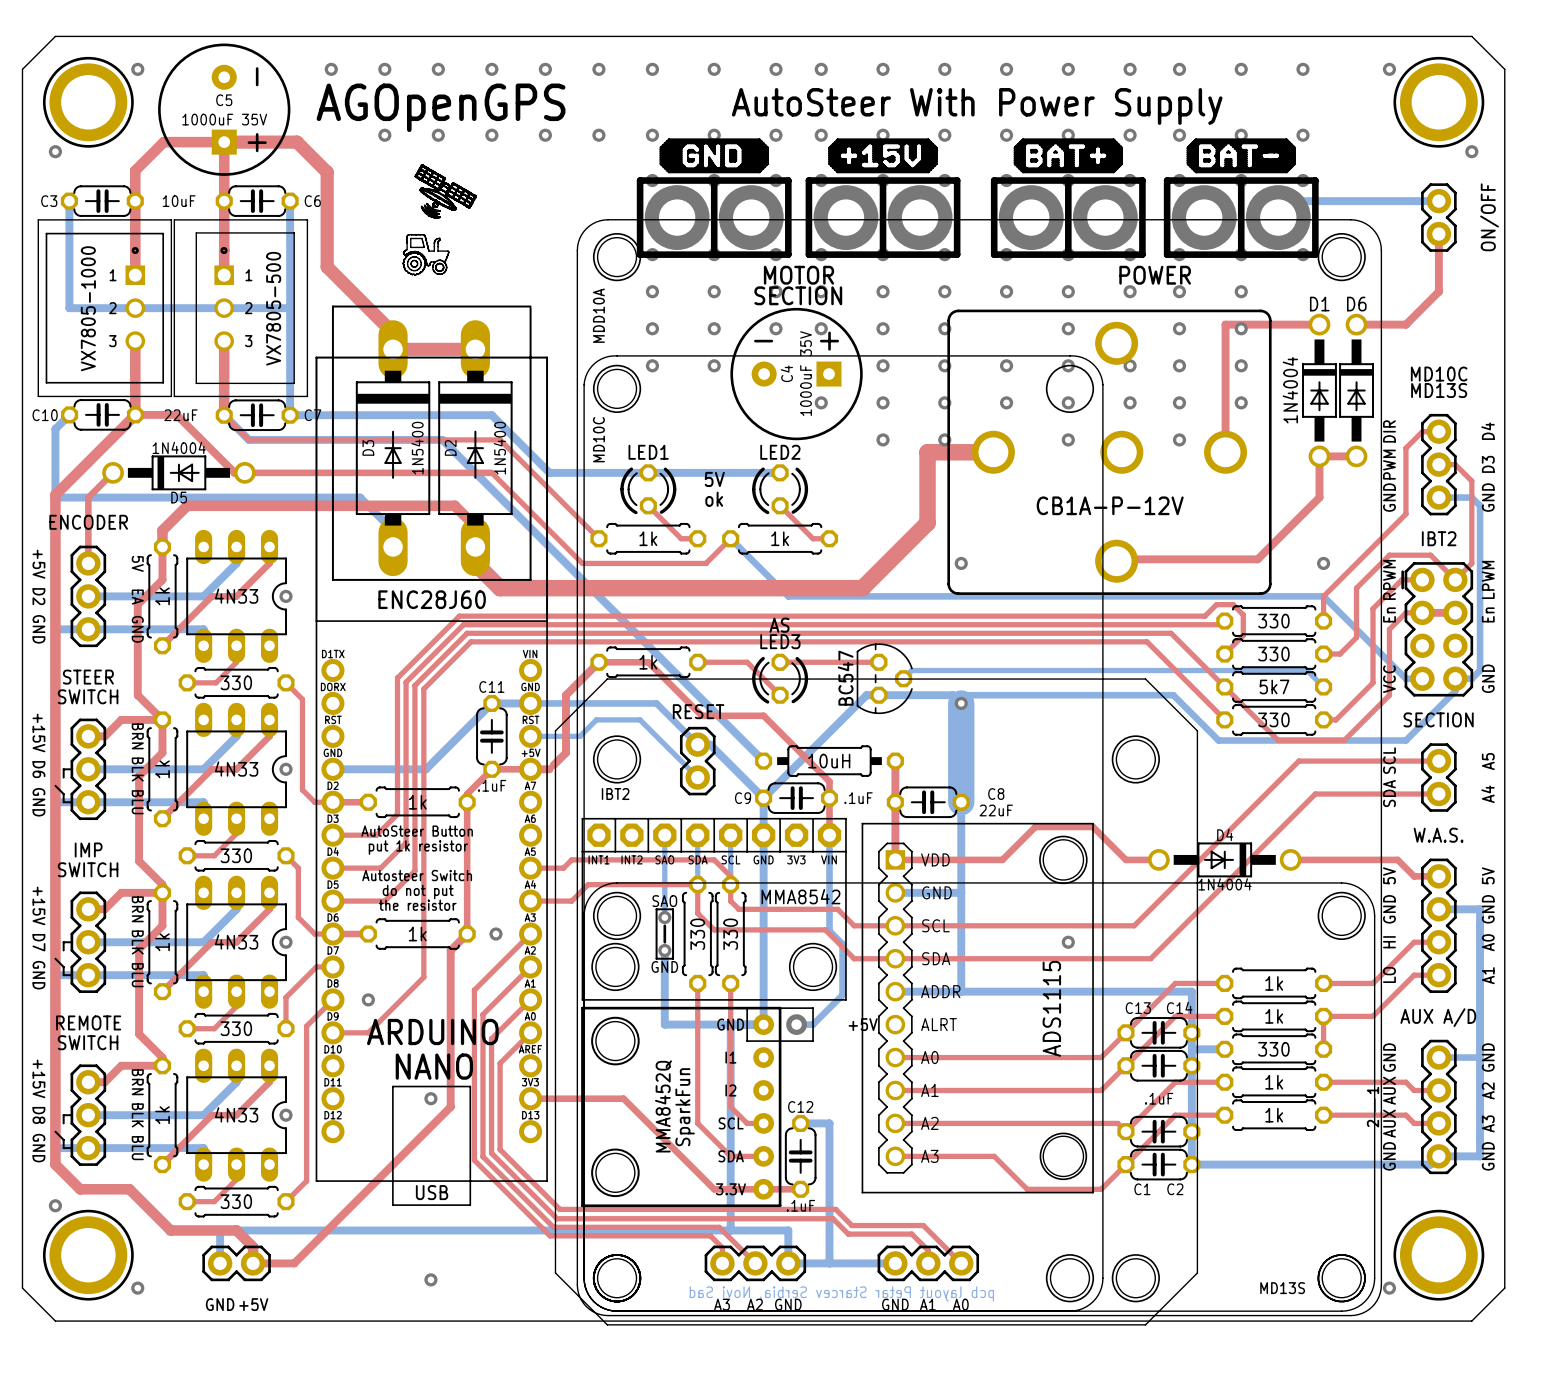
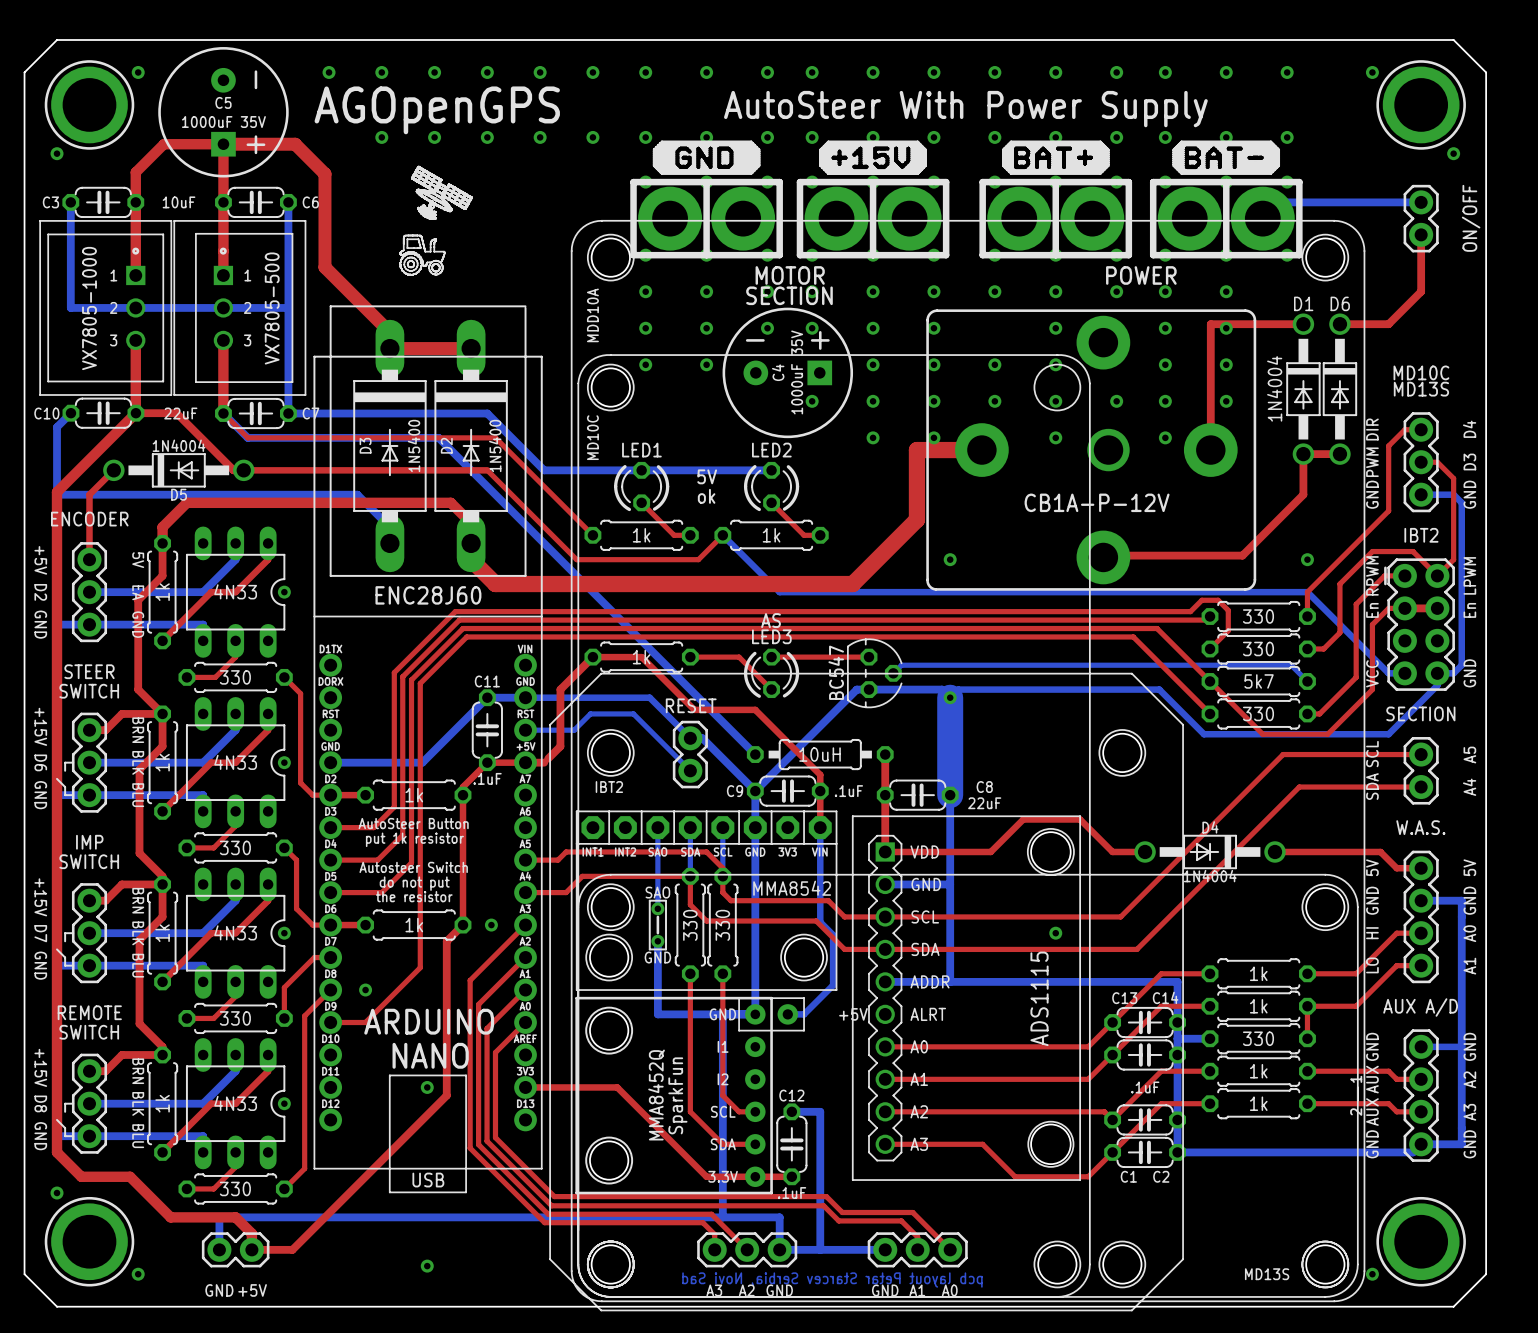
part footprint: [947, 309, 1272, 595] -> [926, 309, 1257, 591]
via: (1130, 365) -> none

